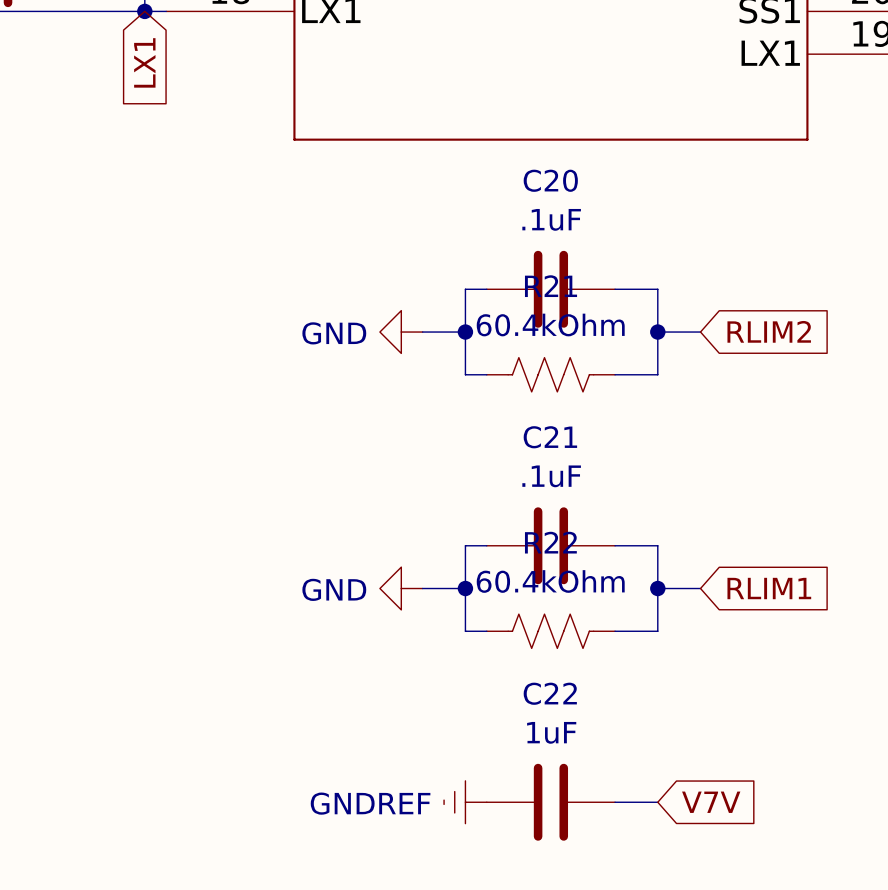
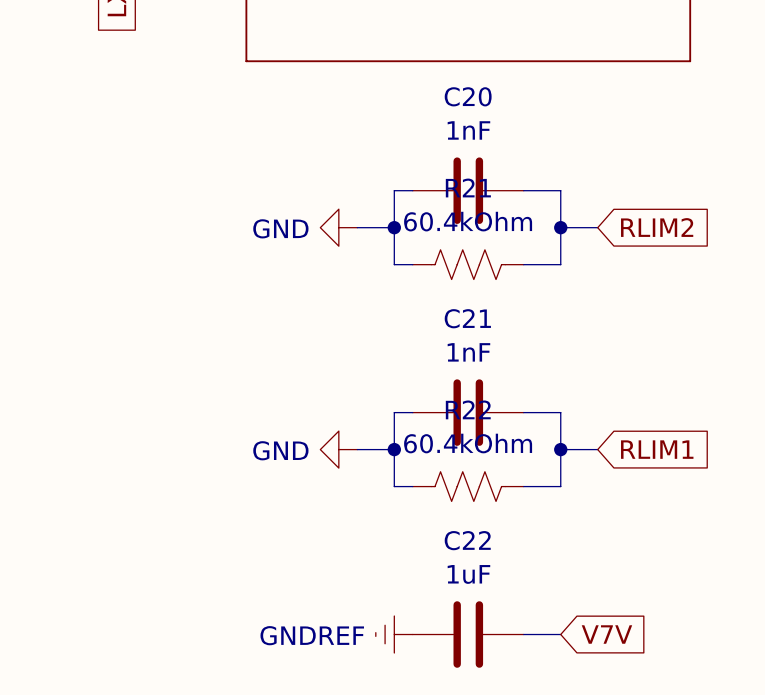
C20 value: .1uF (551, 219) -> 1nF (468, 130)
C21 value: .1uF (551, 476) -> 1nF (468, 352)

